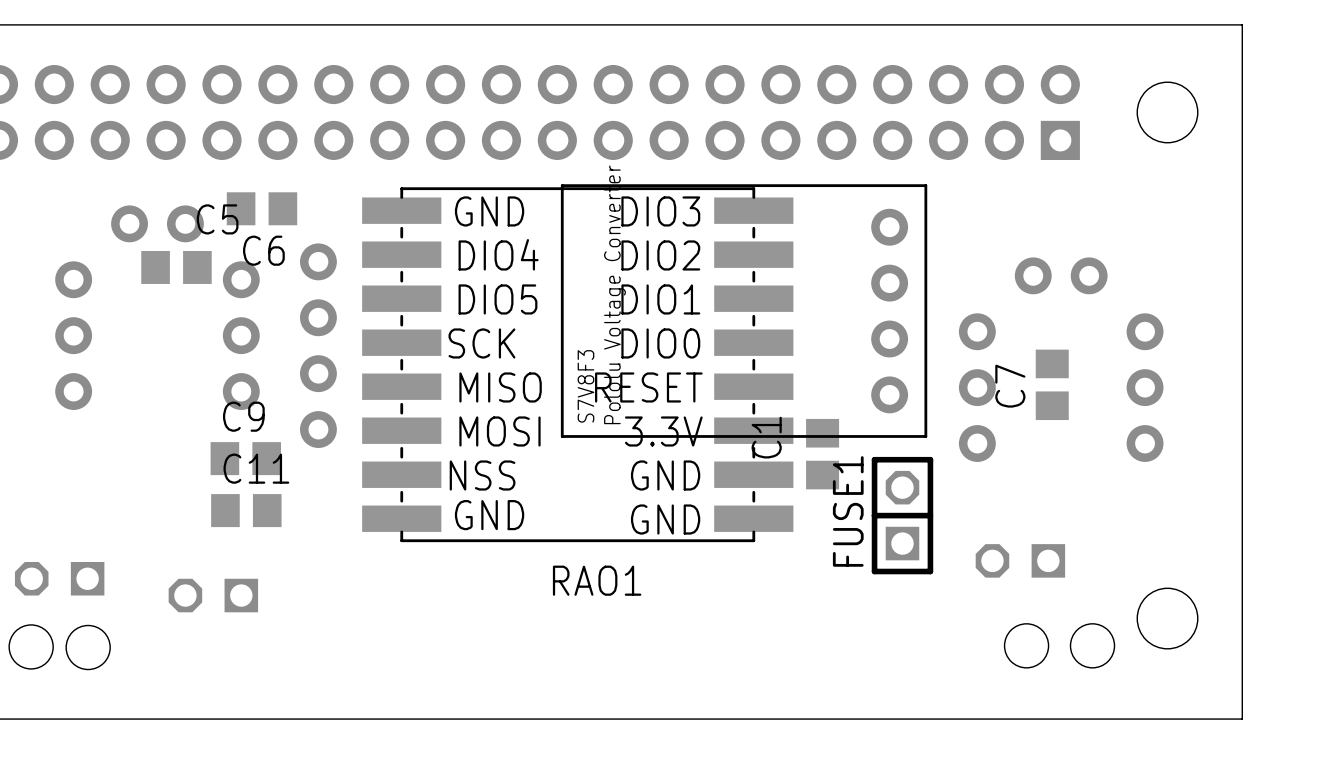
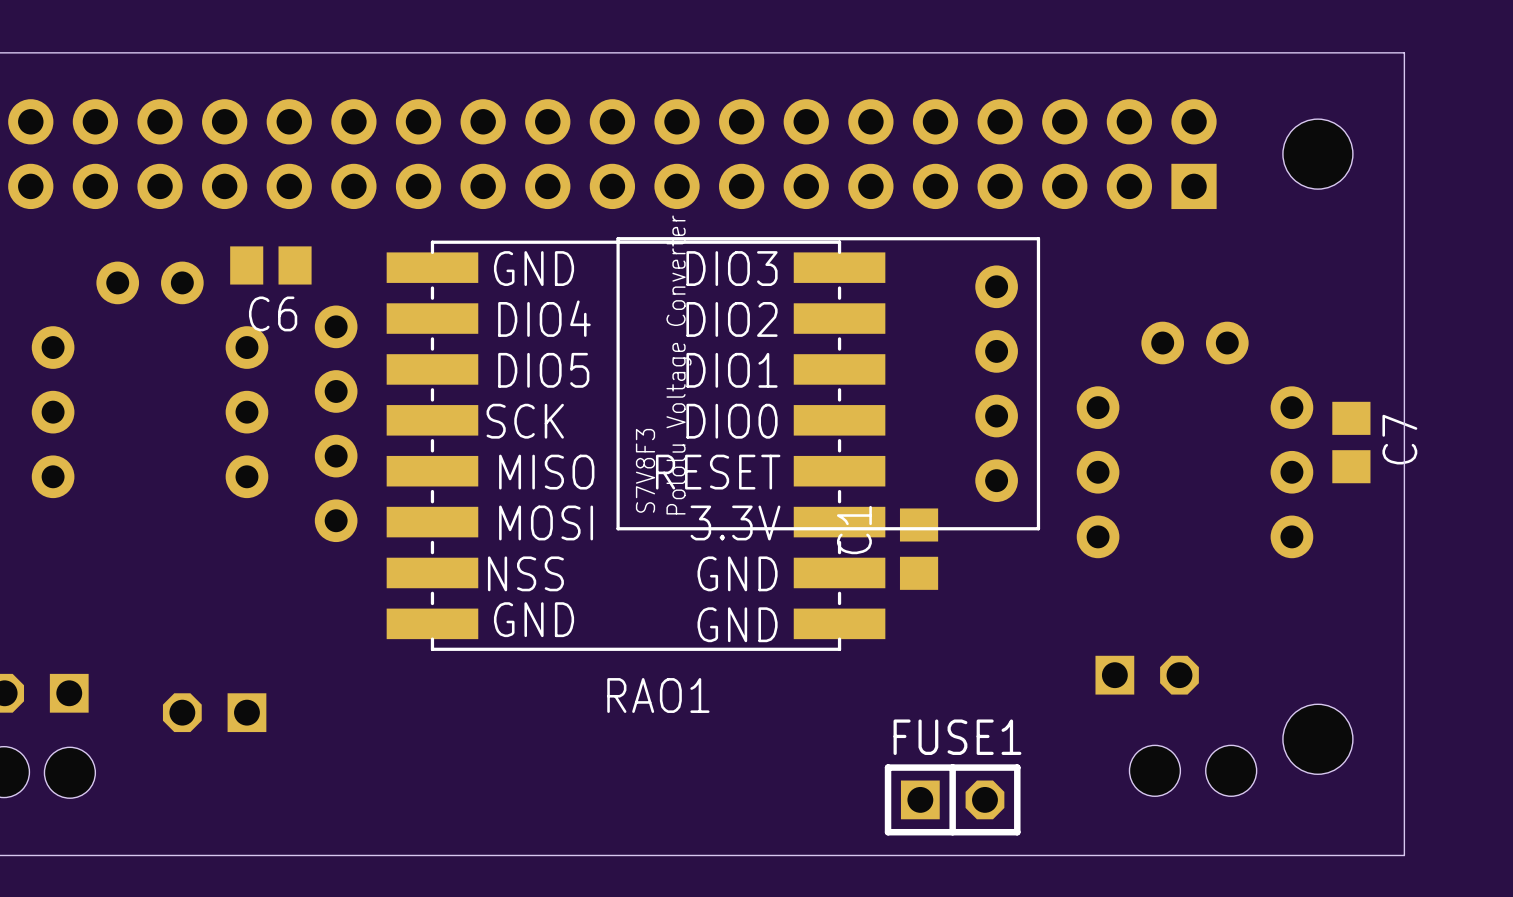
C5: (176, 267) -> none
C7 position: (1052, 384) -> (1351, 442)
C7 name position: C7 (1010, 386) -> C7 (1399, 439)
C9: (245, 458) -> none
C11: (246, 510) -> none
FUSE1 rotation: 0° (902, 515) -> 90° clockwise (952, 799)
FUSE1 position: (902, 515) -> (952, 799)
part rotation: 0° (1020, 560) -> 180° (1147, 675)

